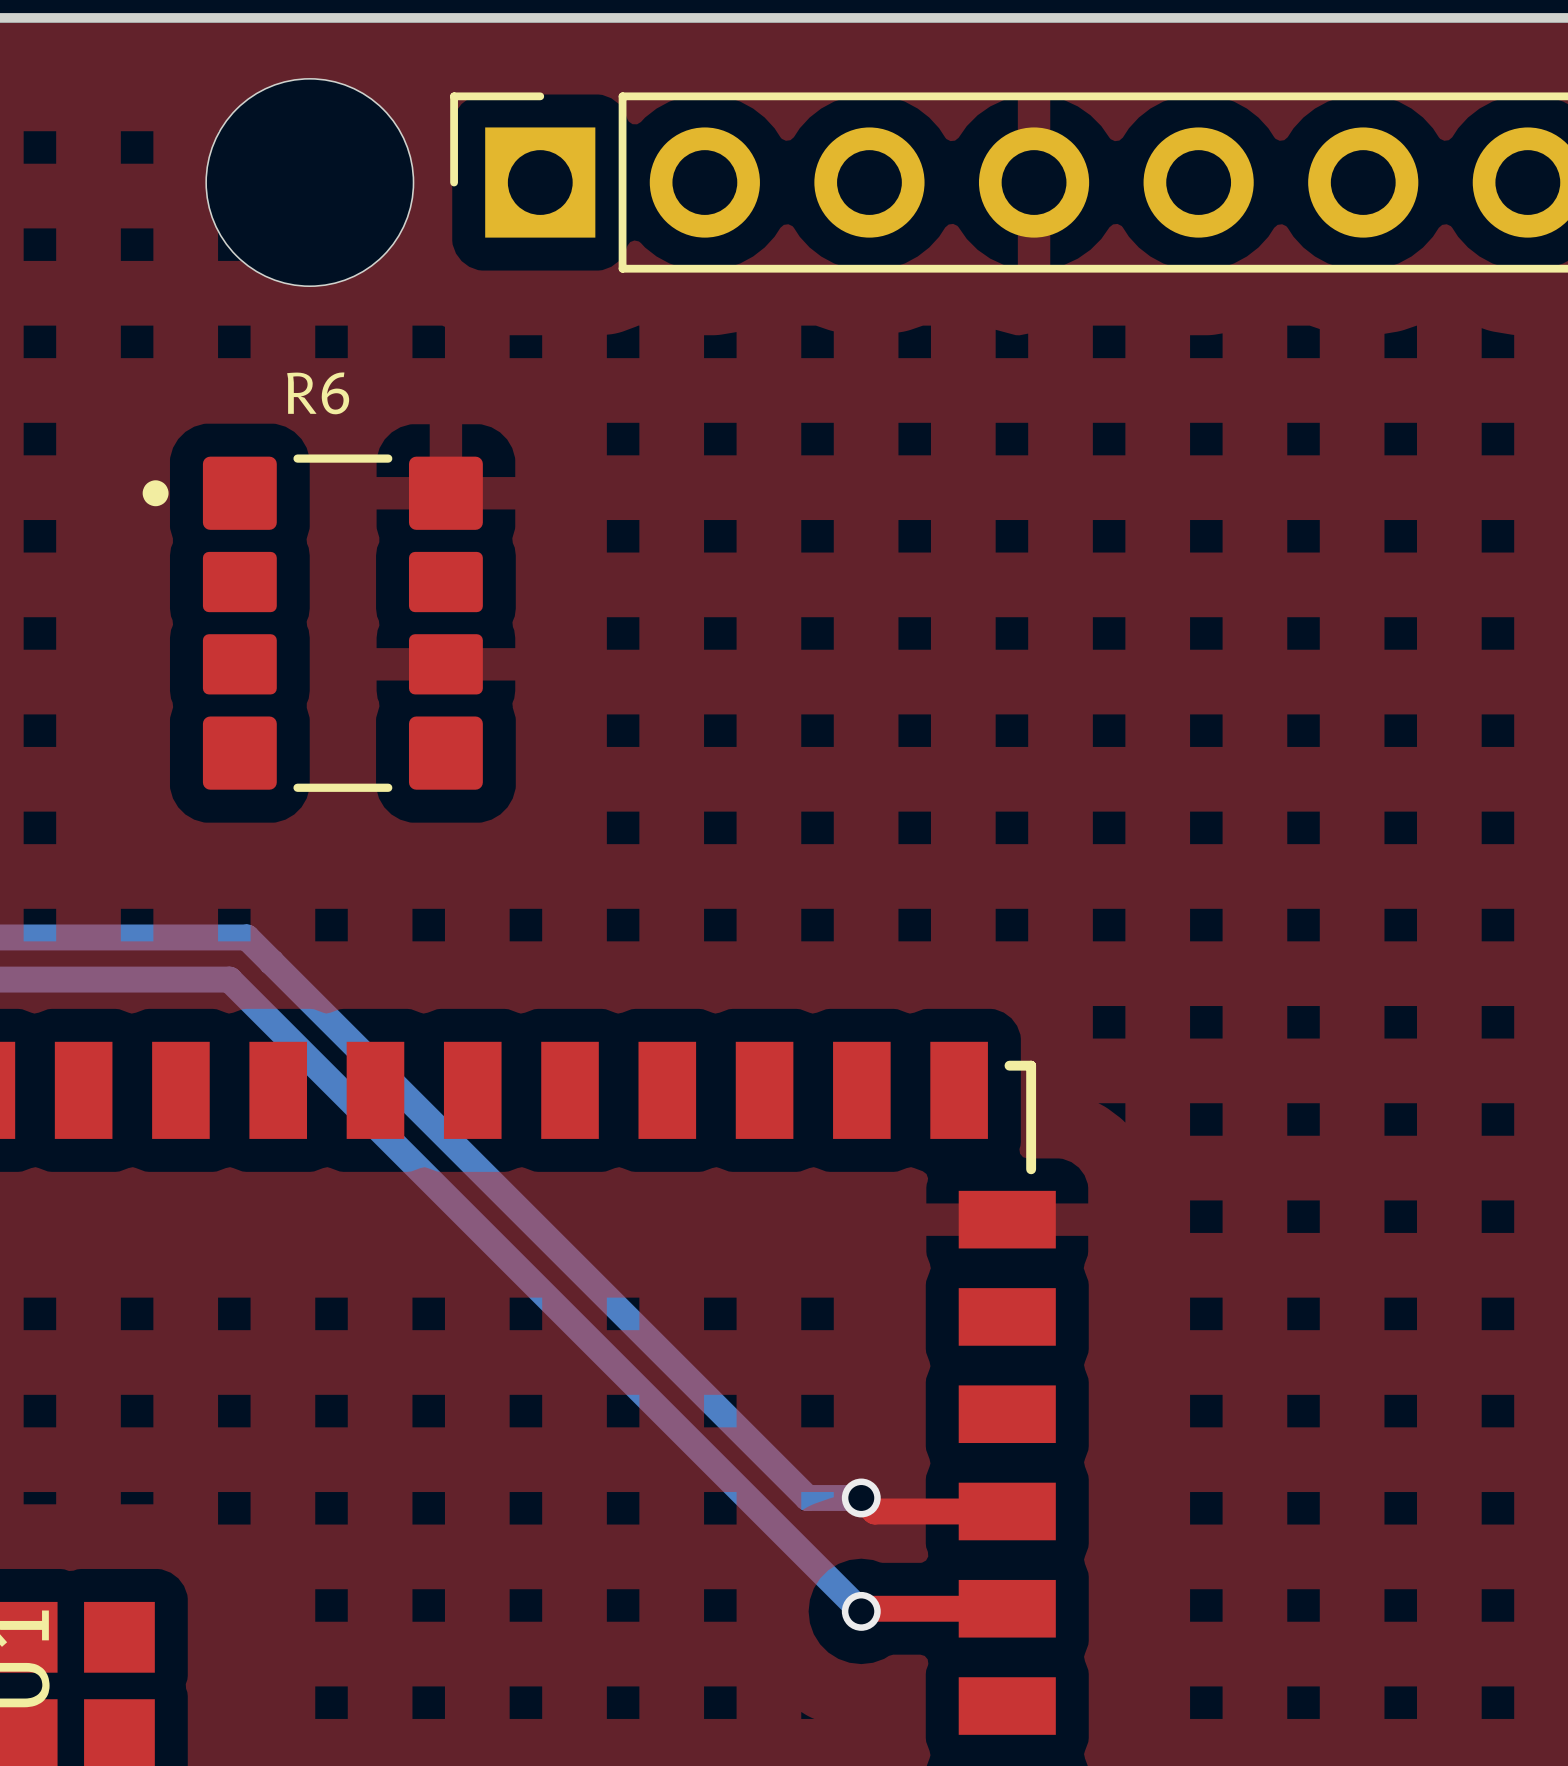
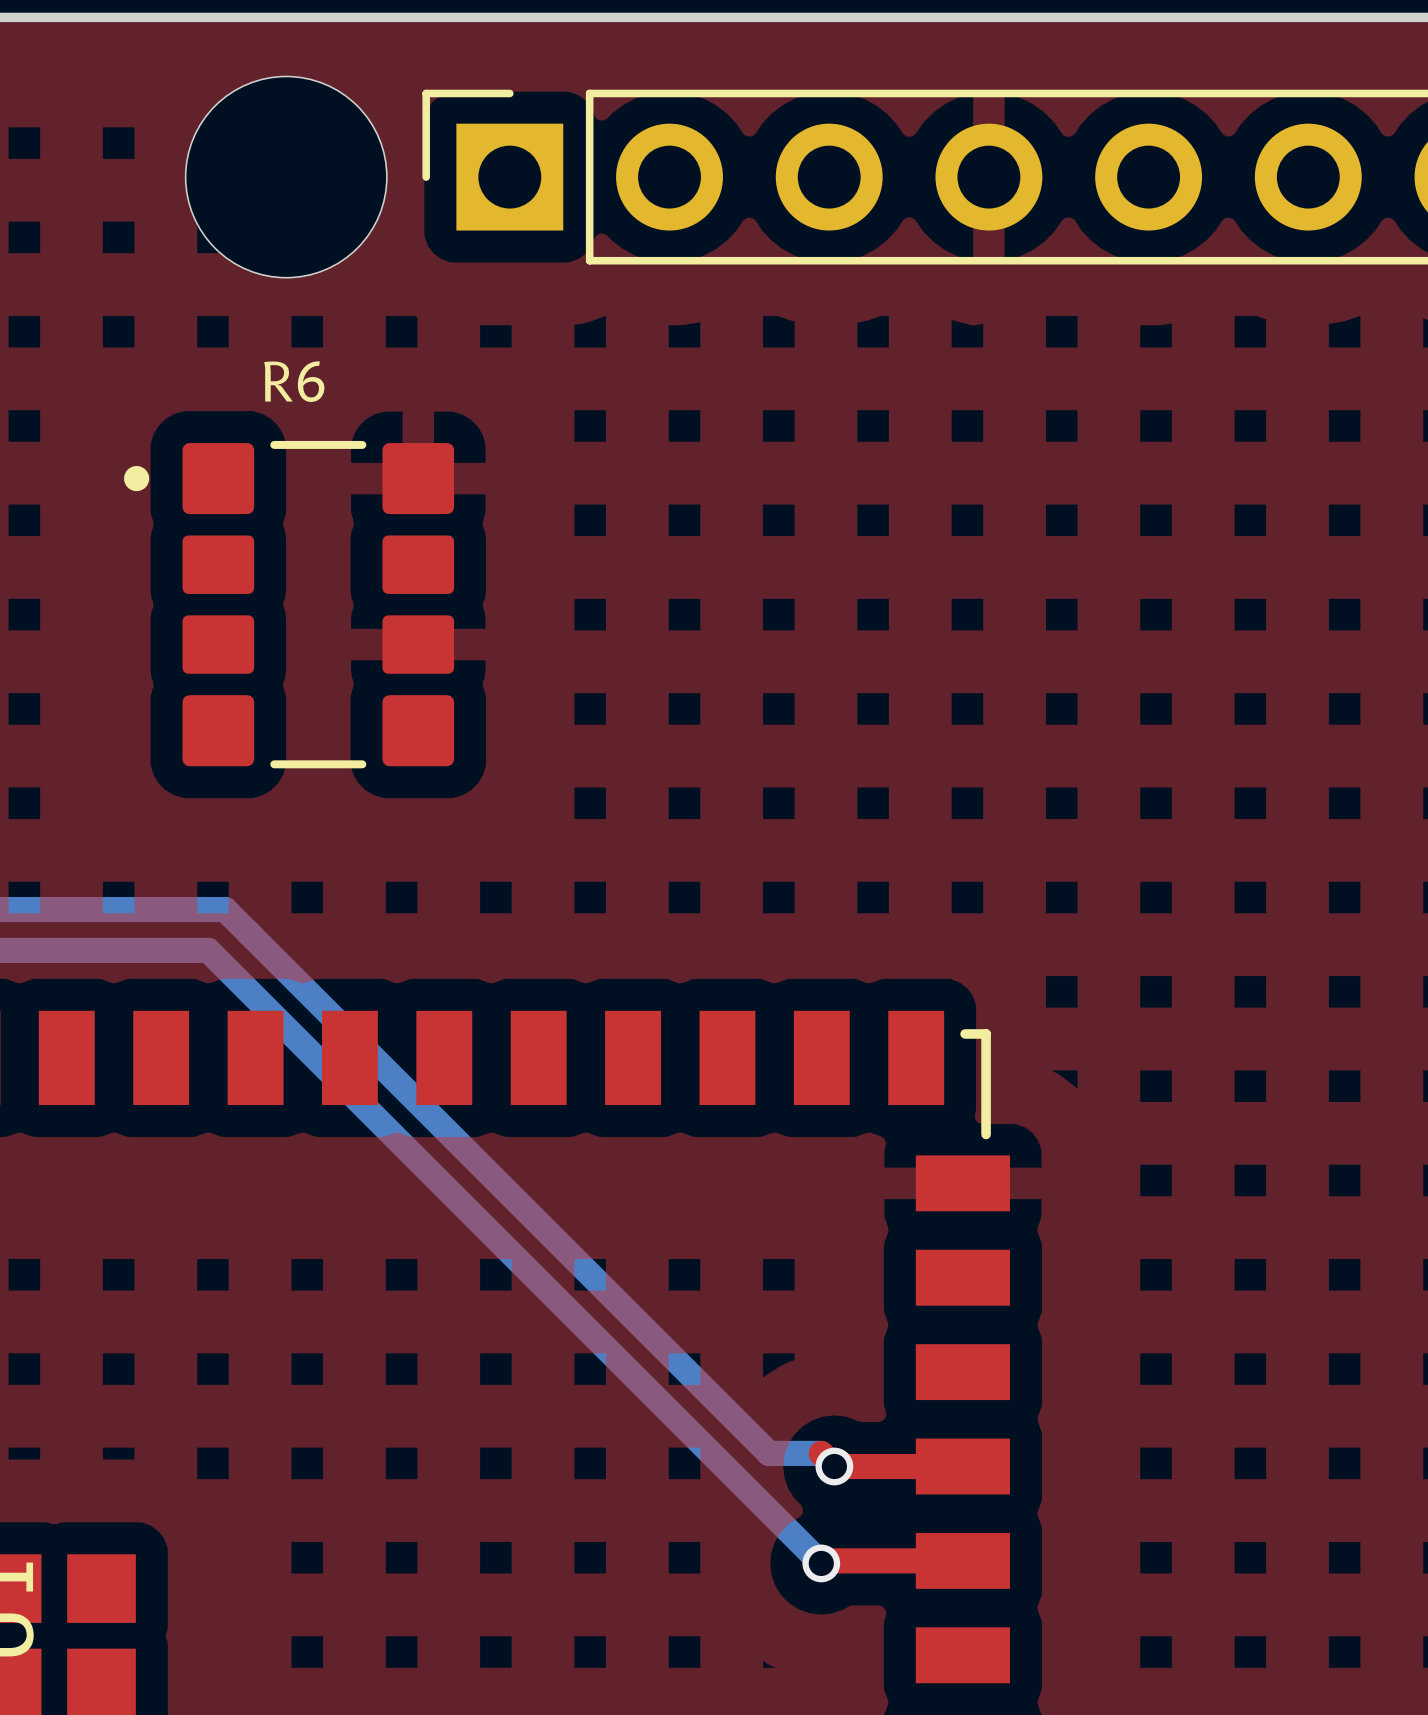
via position: (861, 1497) -> (834, 1466)

